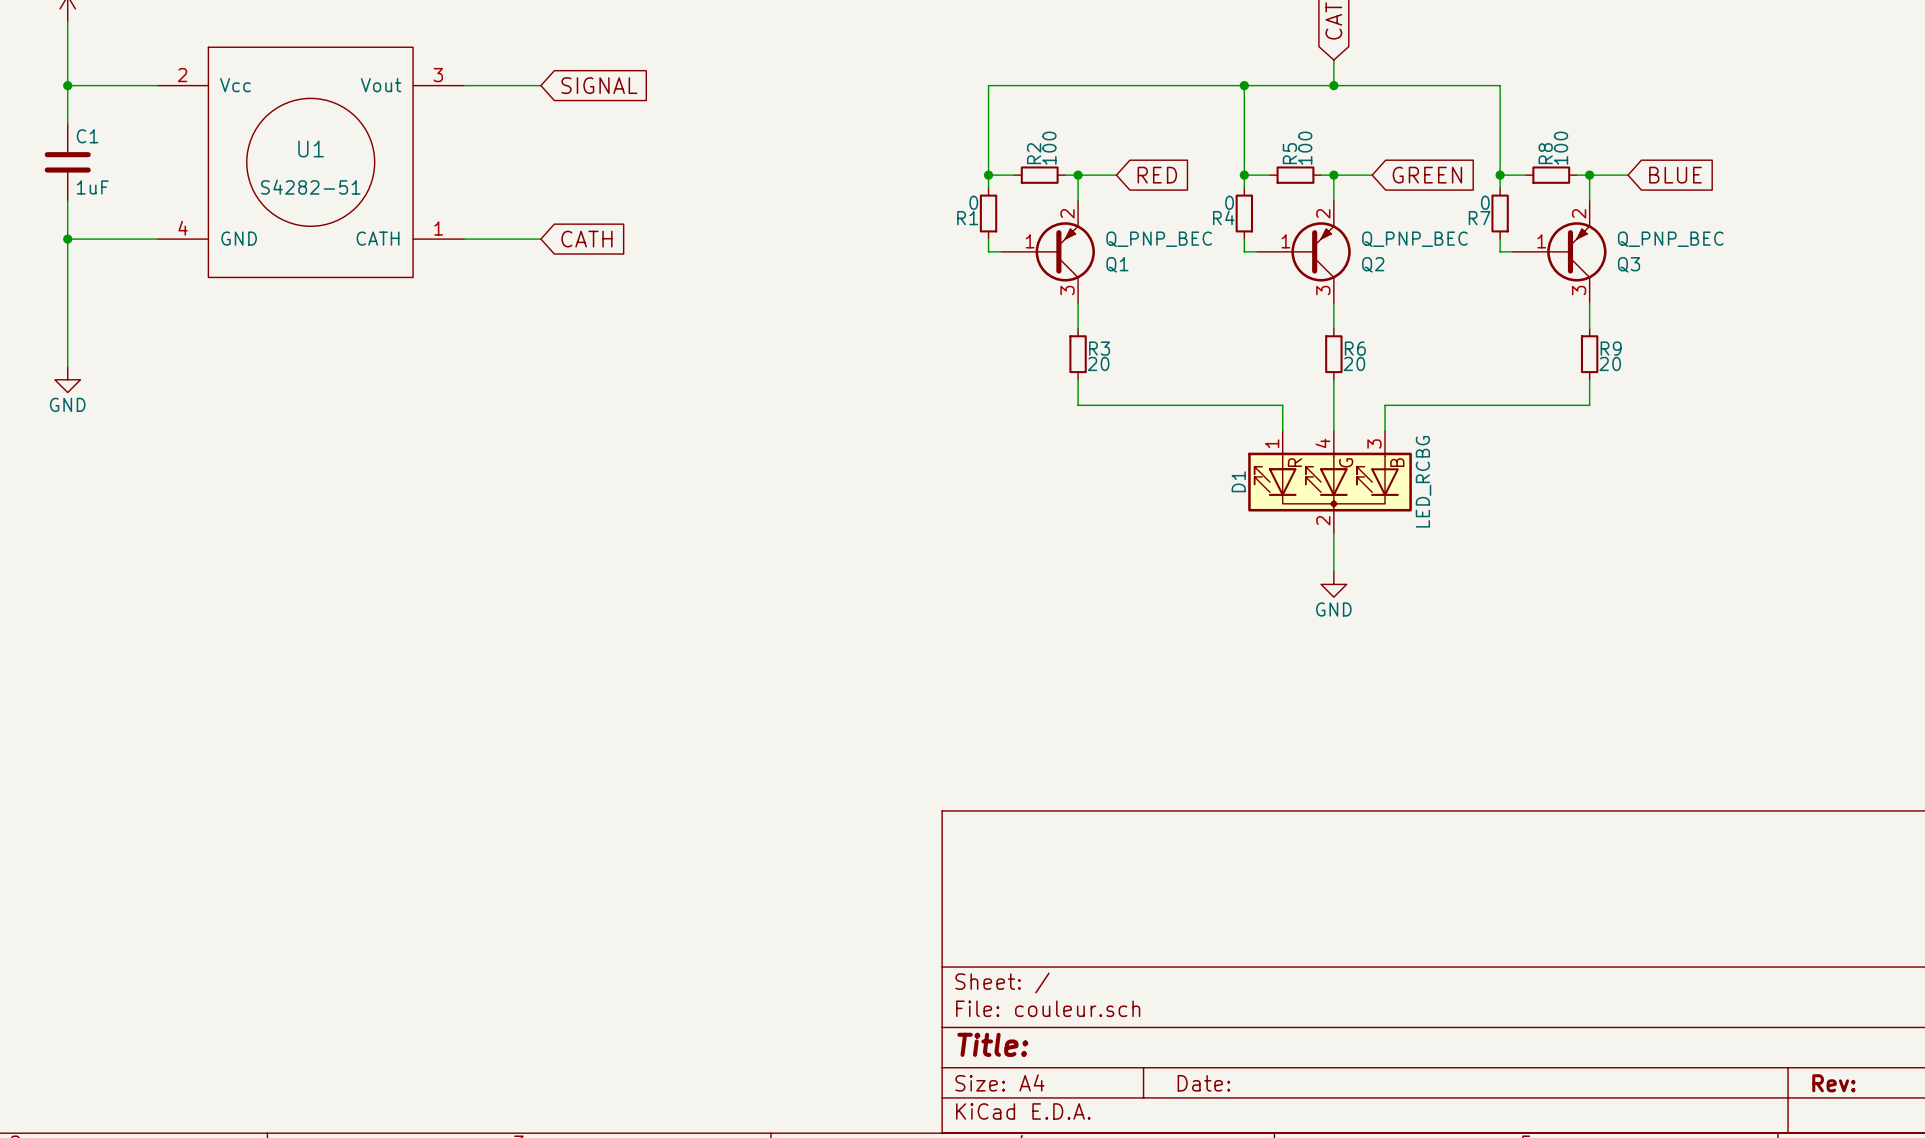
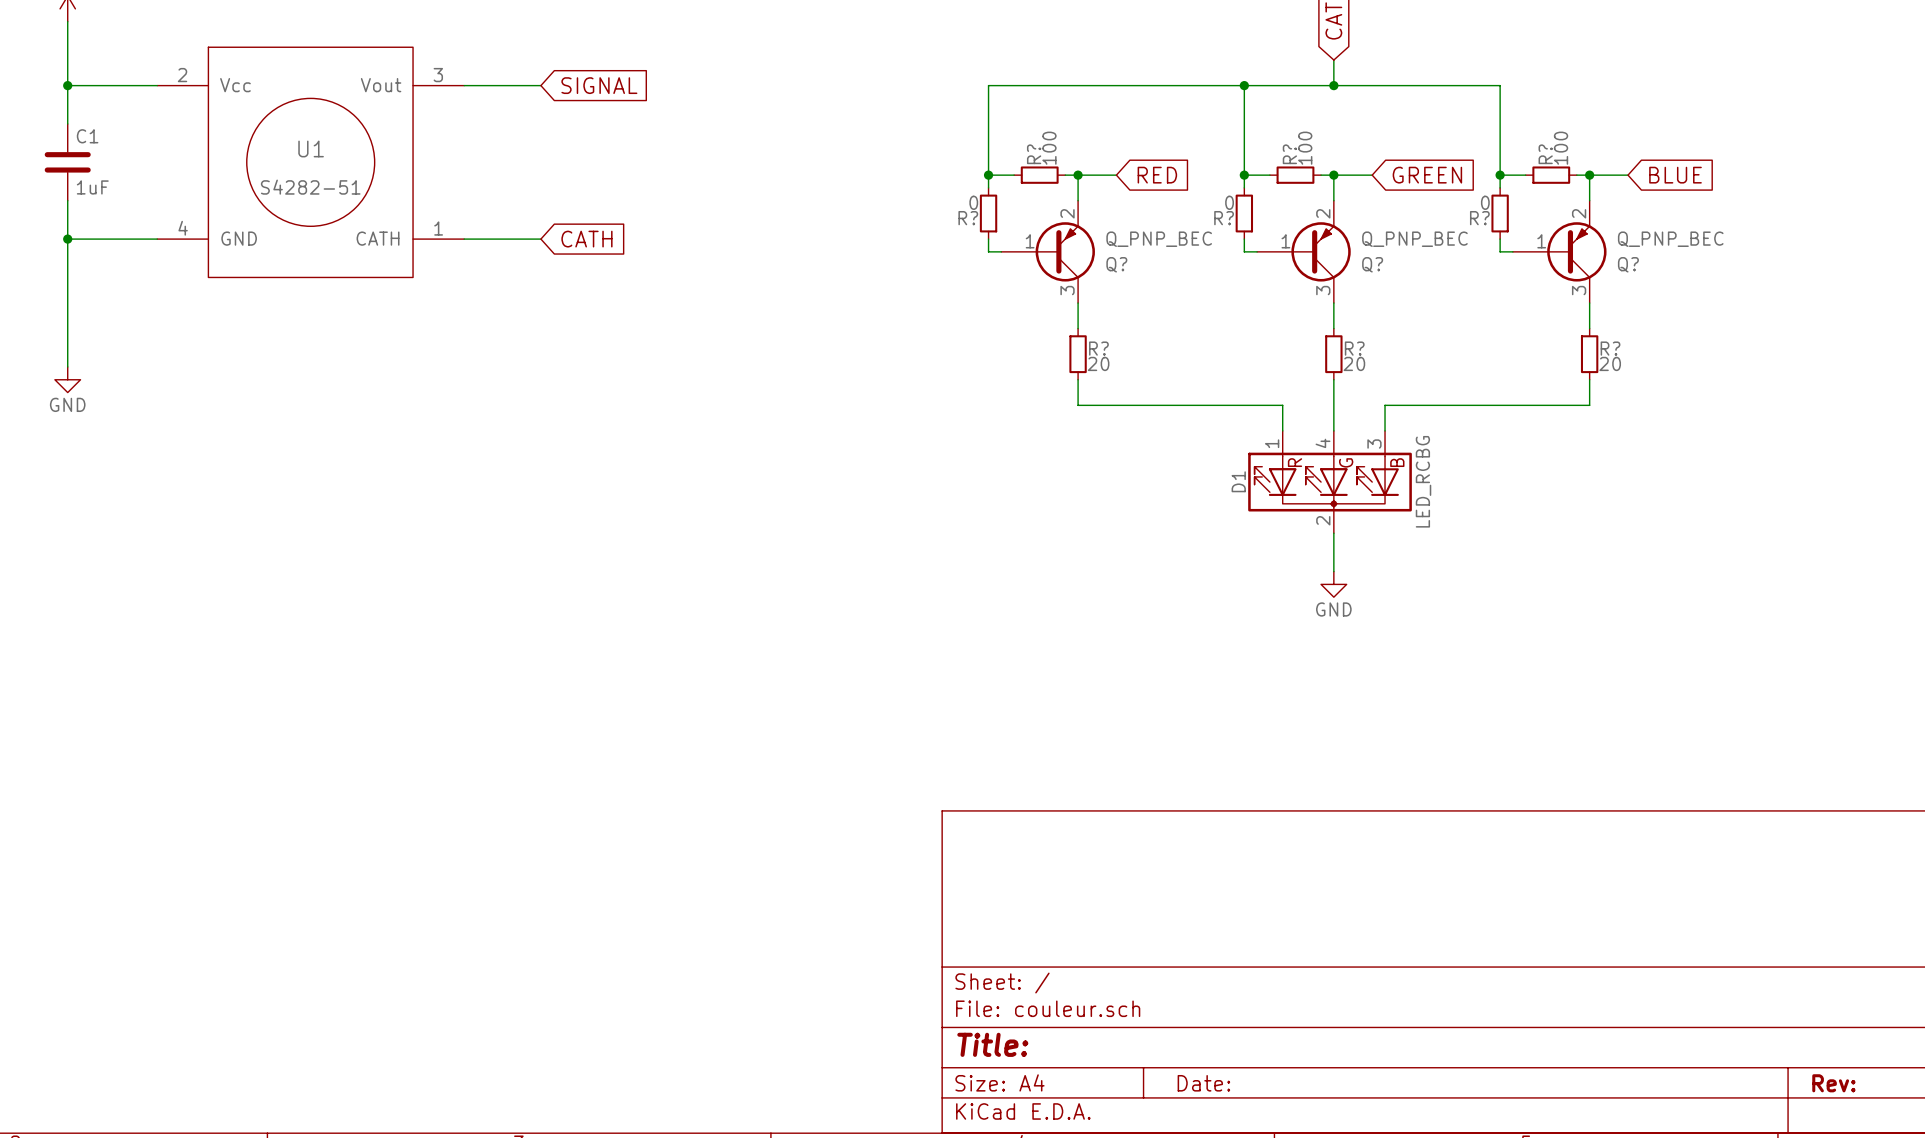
R2 name: R2 (1034, 153) -> R? (1034, 154)
R5 name: R5 (1289, 153) -> R? (1289, 154)
R8 name: R8 (1545, 153) -> R? (1545, 154)
R4 name: R4 (1223, 217) -> R? (1224, 218)
R1 name: R1 (967, 218) -> R? (968, 218)
R7 name: R7 (1479, 218) -> R? (1479, 218)
Q1 name: Q1 (1117, 264) -> Q? (1116, 264)
Q2 name: Q2 (1373, 264) -> Q? (1372, 264)
Q3 name: Q3 (1629, 264) -> Q? (1628, 264)
R3 name: R3 (1099, 348) -> R? (1098, 348)
R6 name: R6 (1355, 348) -> R? (1354, 348)
R9 name: R9 (1611, 348) -> R? (1610, 348)

